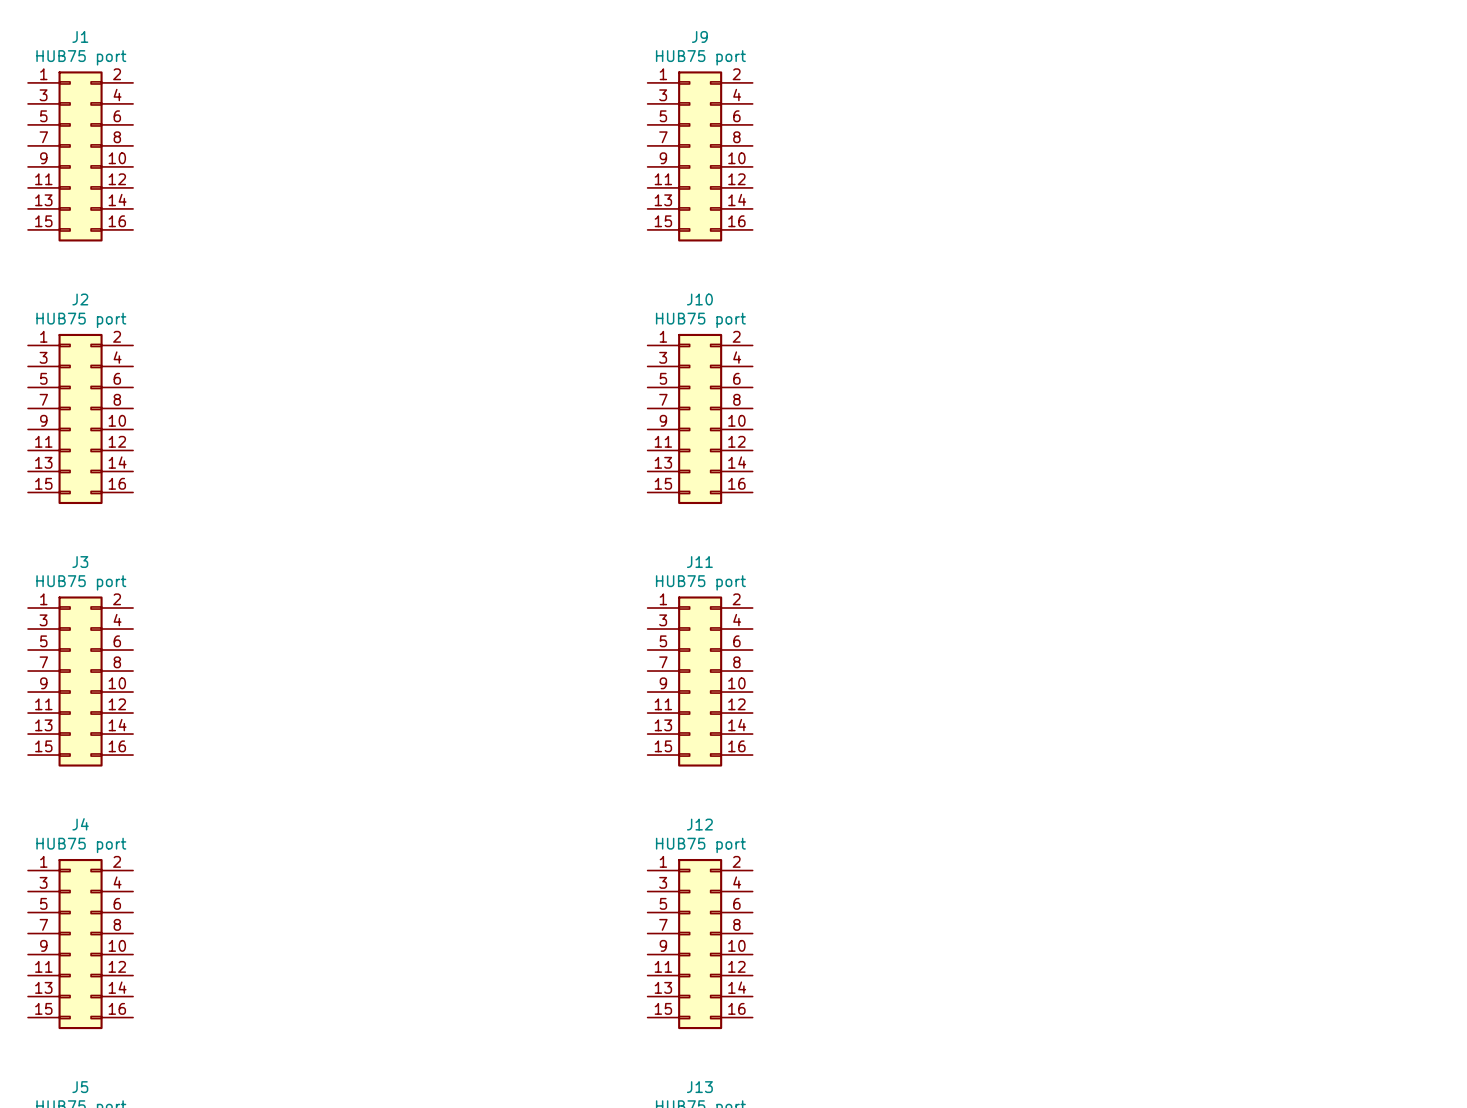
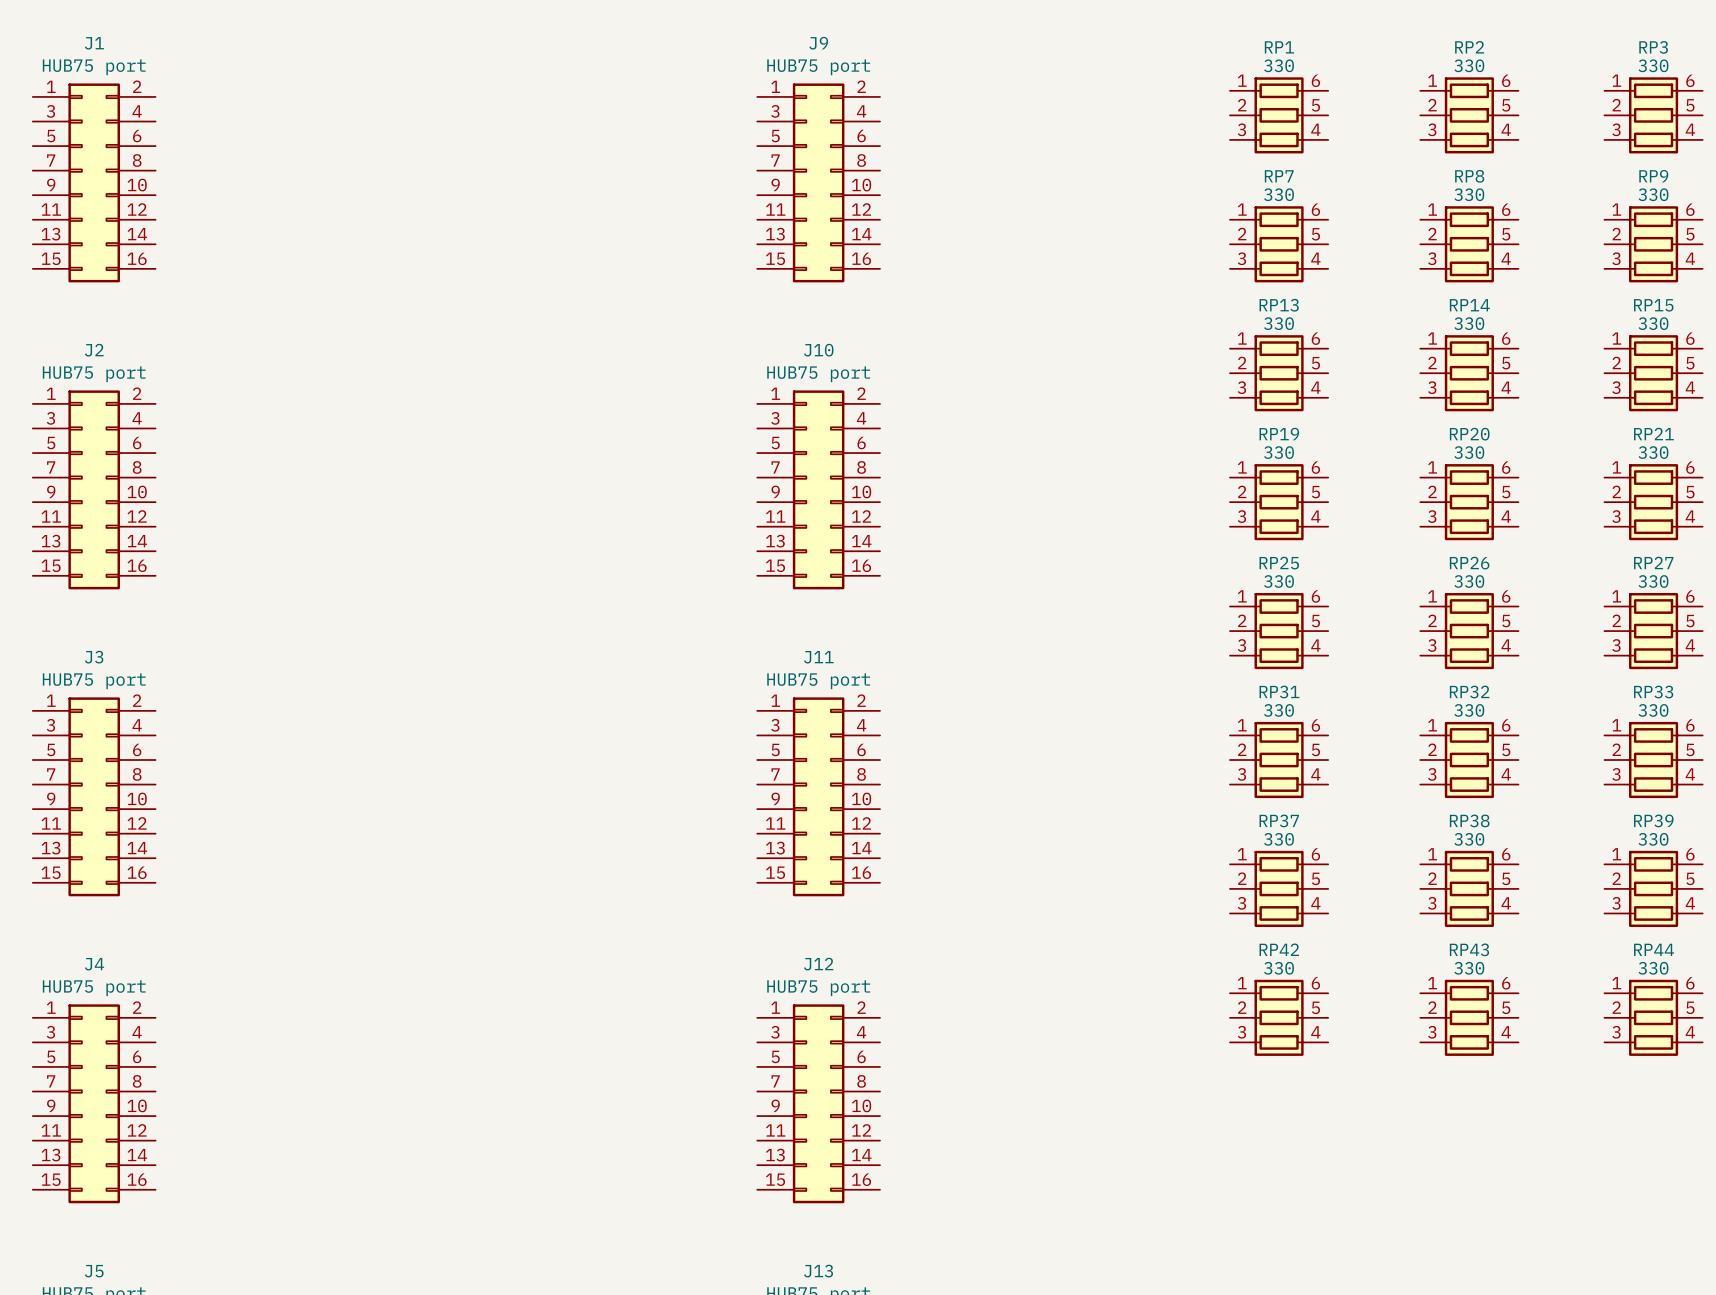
RP1: none -> 330 (1279, 115)
RP2: none -> 330 (1469, 115)
RP3: none -> 330 (1653, 115)
RP7: none -> 330 (1279, 244)
RP8: none -> 330 (1469, 244)
RP9: none -> 330 (1653, 244)
RP13: none -> 330 (1279, 373)
RP14: none -> 330 (1469, 373)
RP15: none -> 330 (1653, 373)
RP19: none -> 330 (1279, 502)
RP20: none -> 330 (1469, 502)
RP21: none -> 330 (1653, 502)
RP25: none -> 330 (1279, 631)
RP26: none -> 330 (1469, 631)
RP27: none -> 330 (1653, 631)
RP31: none -> 330 (1279, 760)
RP32: none -> 330 (1469, 760)
RP33: none -> 330 (1653, 760)
RP37: none -> 330 (1279, 888)
RP38: none -> 330 (1469, 888)
RP39: none -> 330 (1653, 888)
RP42: none -> 330 (1279, 1017)
RP43: none -> 330 (1469, 1017)
RP44: none -> 330 (1653, 1017)

